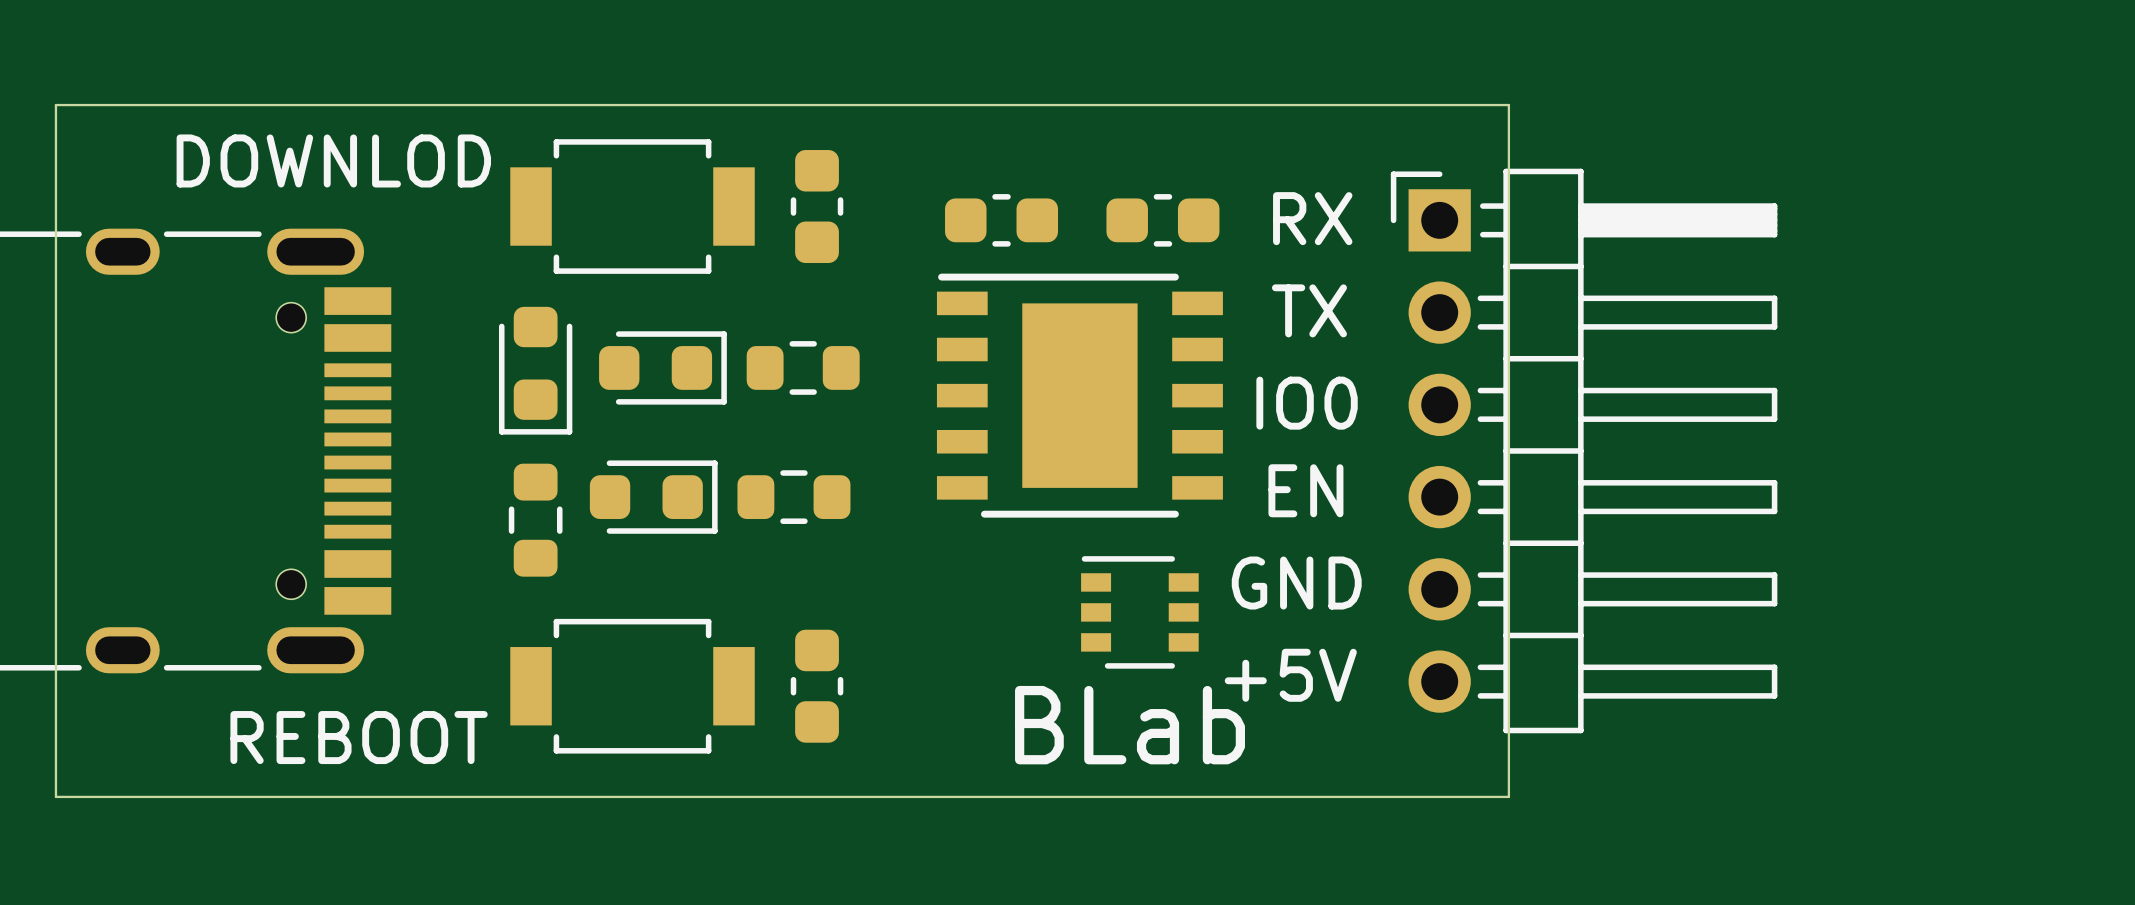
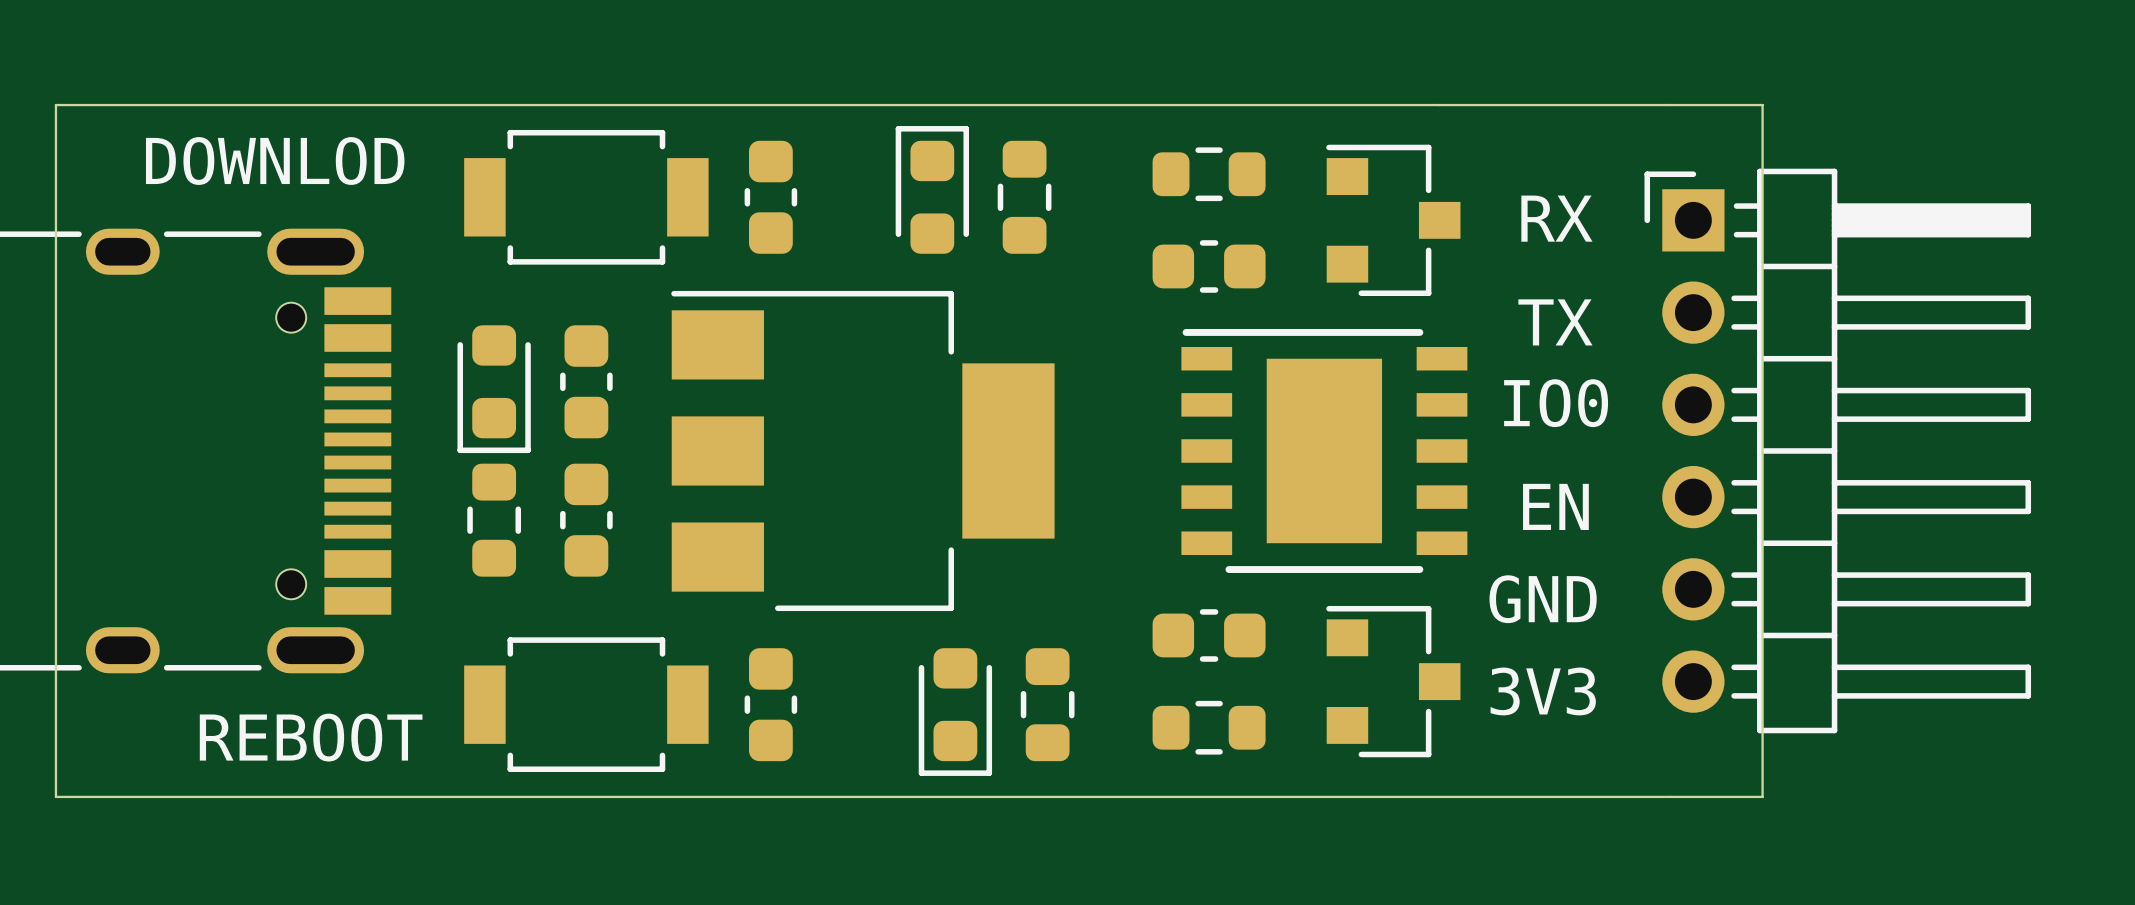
board edge: (1508, 105) (1508, 796) -> (1508, 105) (1762, 105) (1762, 796) (1508, 796)
text position: DOWNLOD (333, 160) -> DOWNLOD (275, 161)
part: none -> (1209, 174)
part: none -> (932, 189)
part footprint: [945, 194, 1059, 247] -> [997, 140, 1052, 254]
part position: (632, 206) -> (586, 197)
part position: (817, 206) -> (770, 197)
text position: RX (1312, 218) -> RX (1556, 218)
part position: (1162, 220) -> (1209, 266)
part: none -> (1393, 220)
text position: TX (1309, 310) -> TX (1555, 322)
part: (662, 367) -> none
part: (803, 367) -> none
part position: (535, 370) -> (494, 389)
part: none -> (586, 381)
part position: (1079, 395) -> (1324, 450)
text position: IO0 (1307, 403) -> IO0 (1556, 403)
part: none -> (862, 450)
part position: (1584, 450) -> (1837, 450)
text position: EN (1305, 490) -> EN (1555, 506)
part: (653, 497) -> none
part: (793, 497) -> none
part position: (535, 520) -> (494, 520)
part: none -> (586, 520)
text position: GND (1296, 583) -> GND (1543, 599)
part: (1139, 612) -> none
part: none -> (1209, 635)
text: +5V (1290, 675) -> none
part: none -> (1393, 681)
part position: (632, 686) -> (586, 704)
part position: (817, 686) -> (770, 704)
text: none -> 3V3 (1543, 691)
part: none -> (1047, 704)
part: none -> (955, 712)
text: BLab (1130, 725) -> none
part: none -> (1209, 727)
text position: REBOOT (359, 737) -> REBOOT (311, 737)

